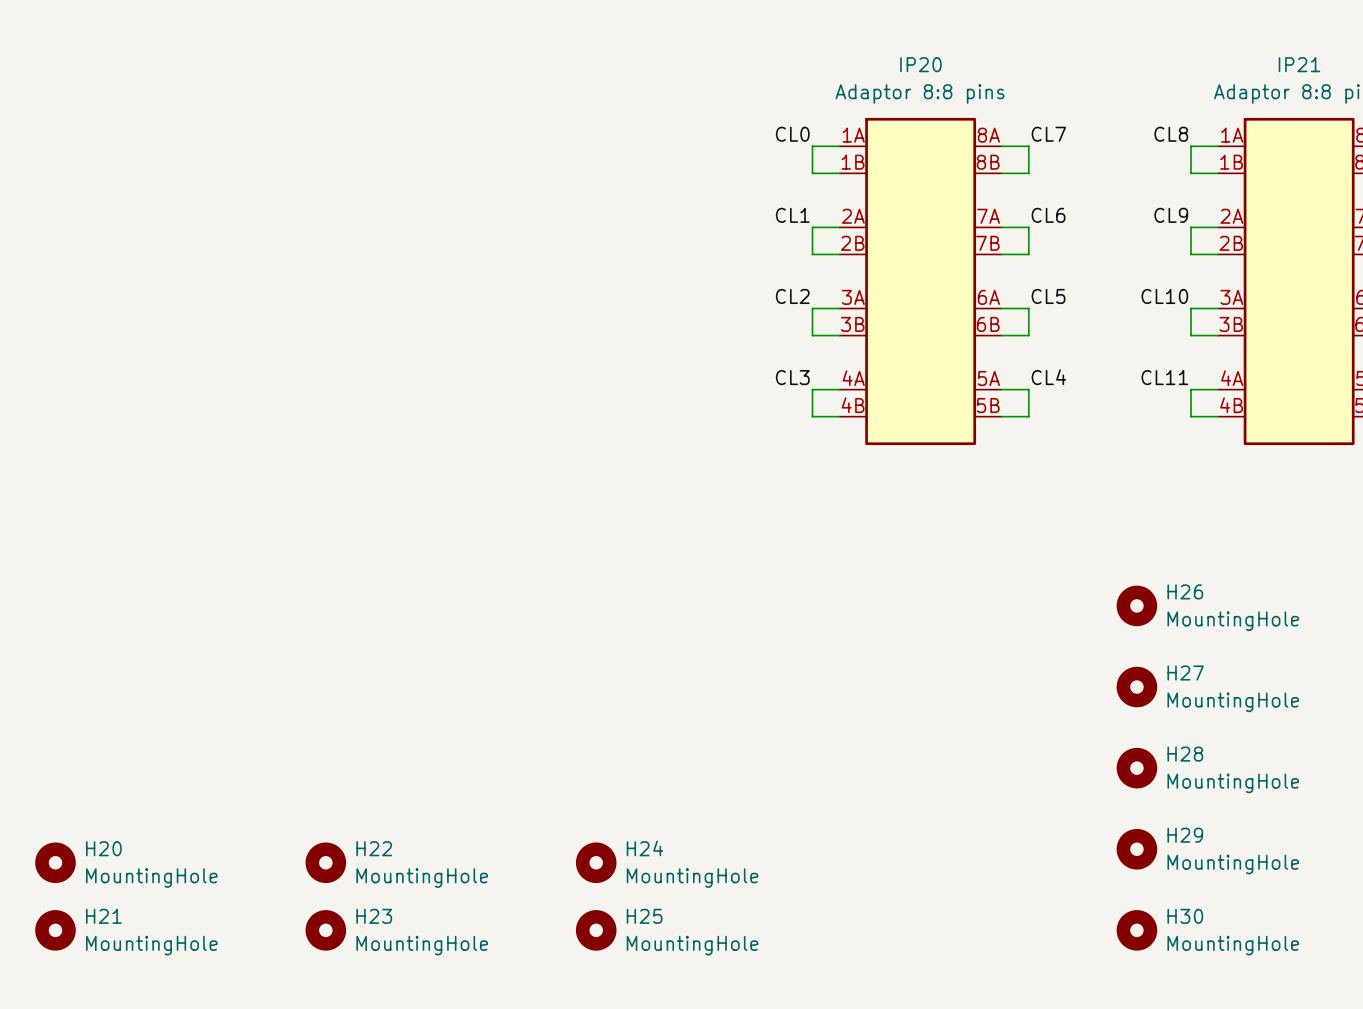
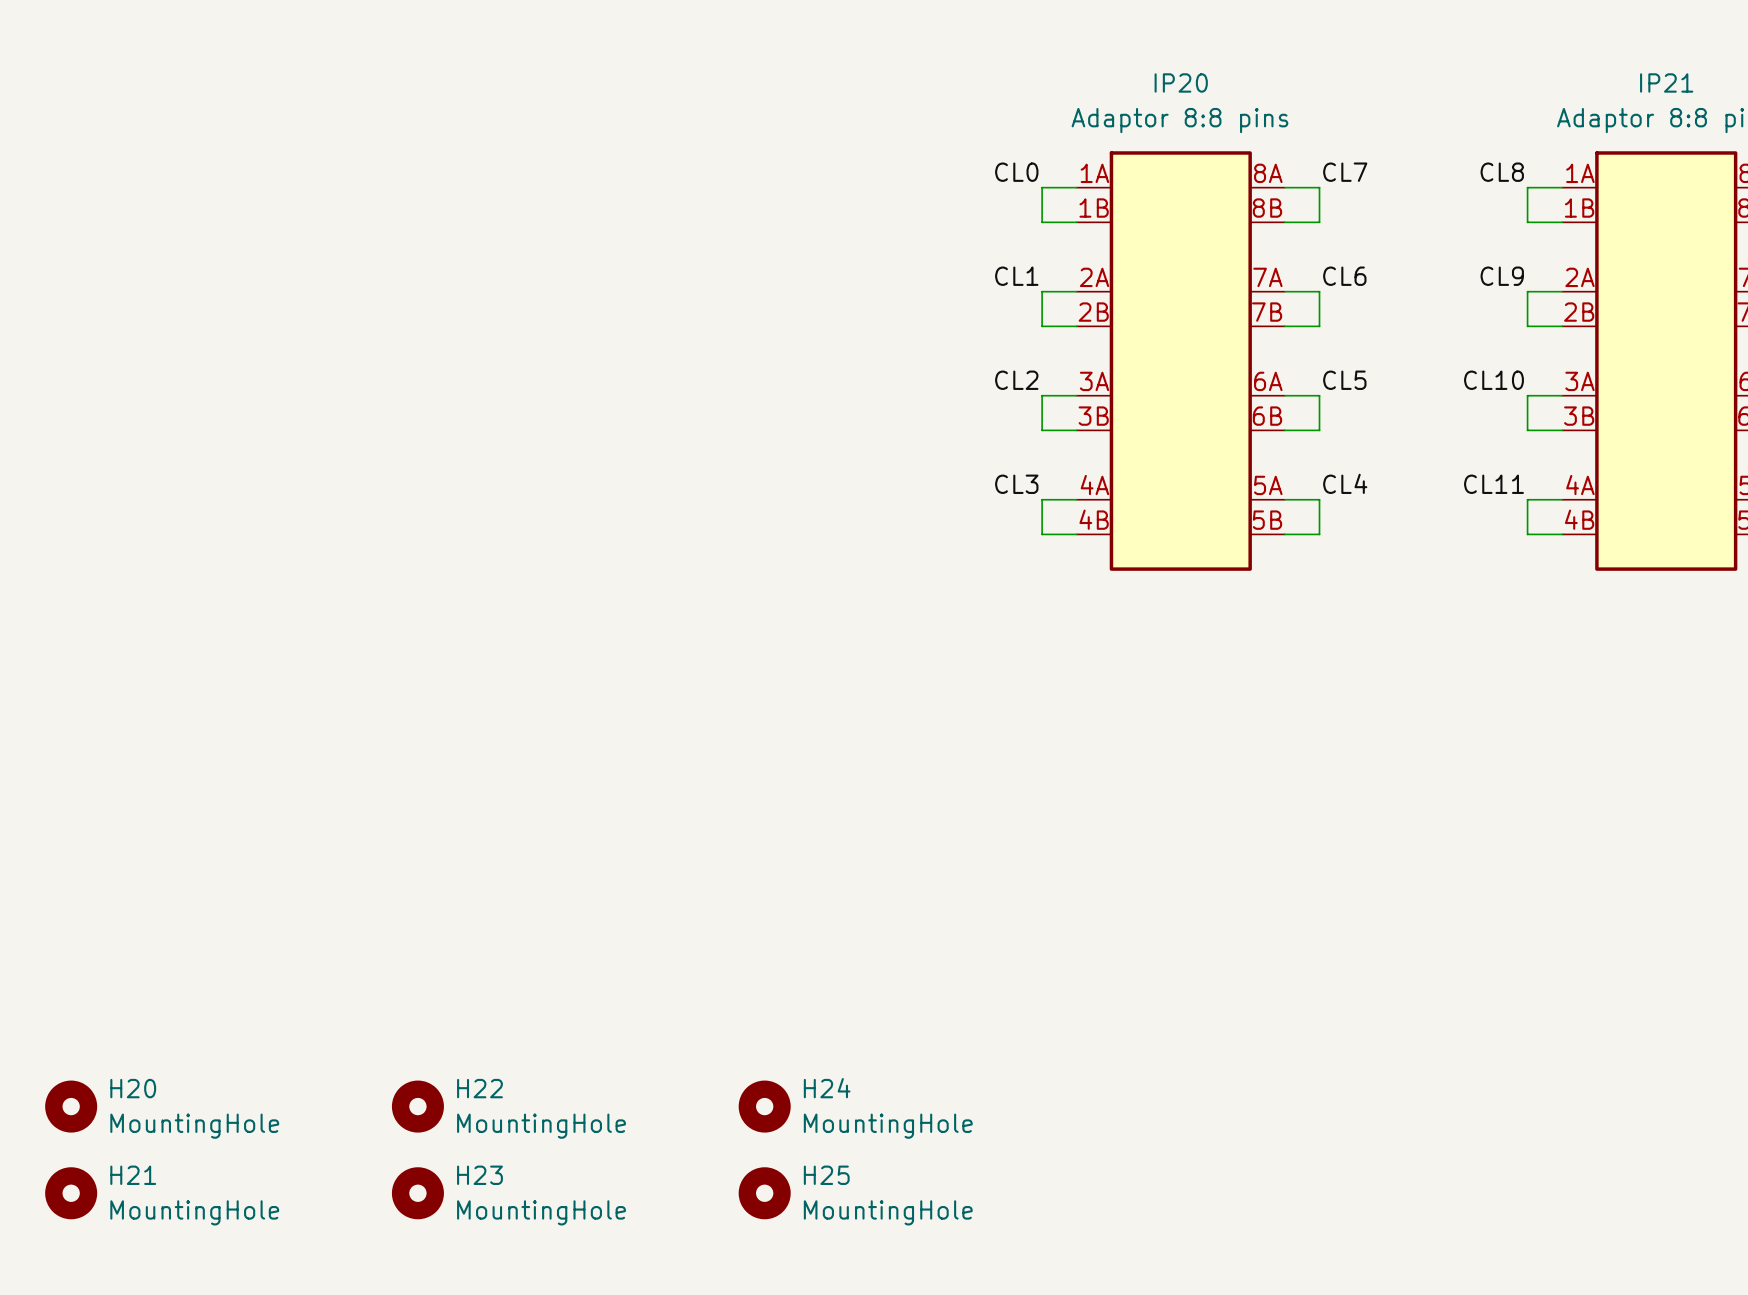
H26: MountingHole (1136, 605) -> none
H27: MountingHole (1136, 687) -> none
H28: MountingHole (1136, 768) -> none
H29: MountingHole (1136, 849) -> none
H30: MountingHole (1136, 930) -> none

